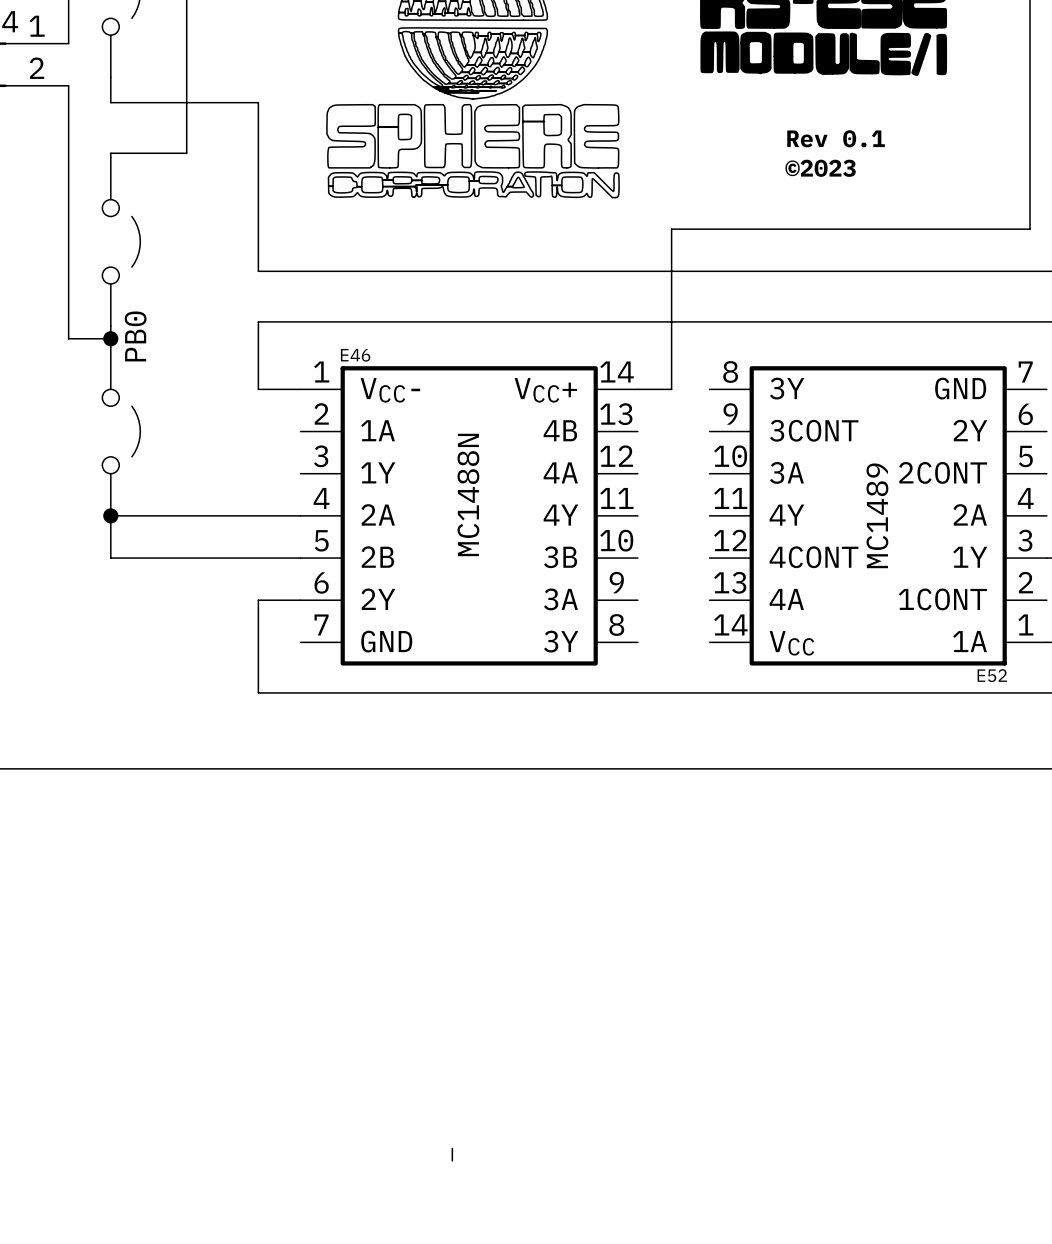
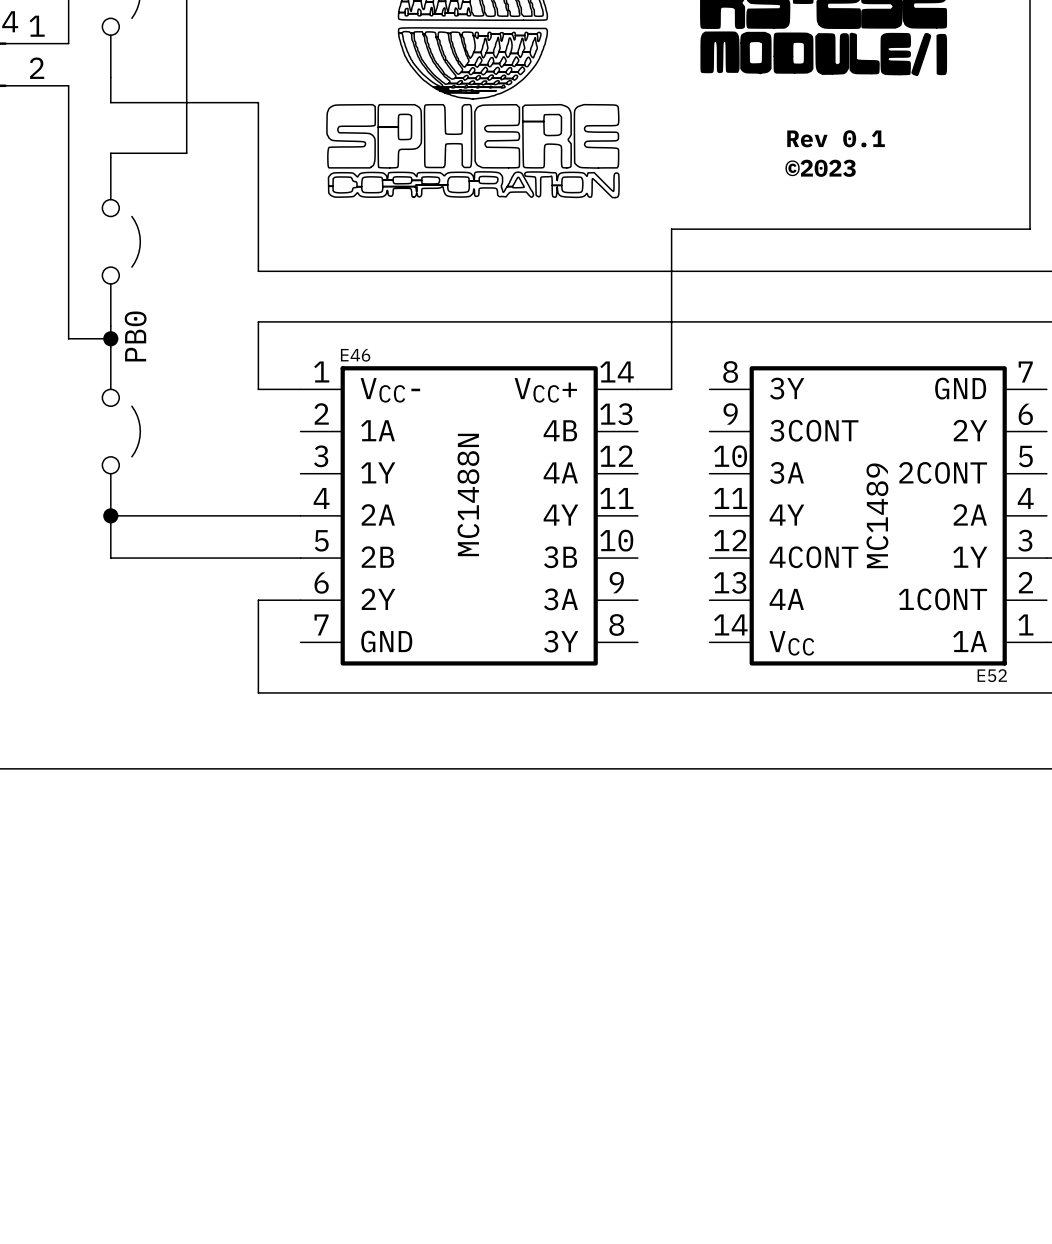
wire: (452, 1148) (452, 1161) -> none

